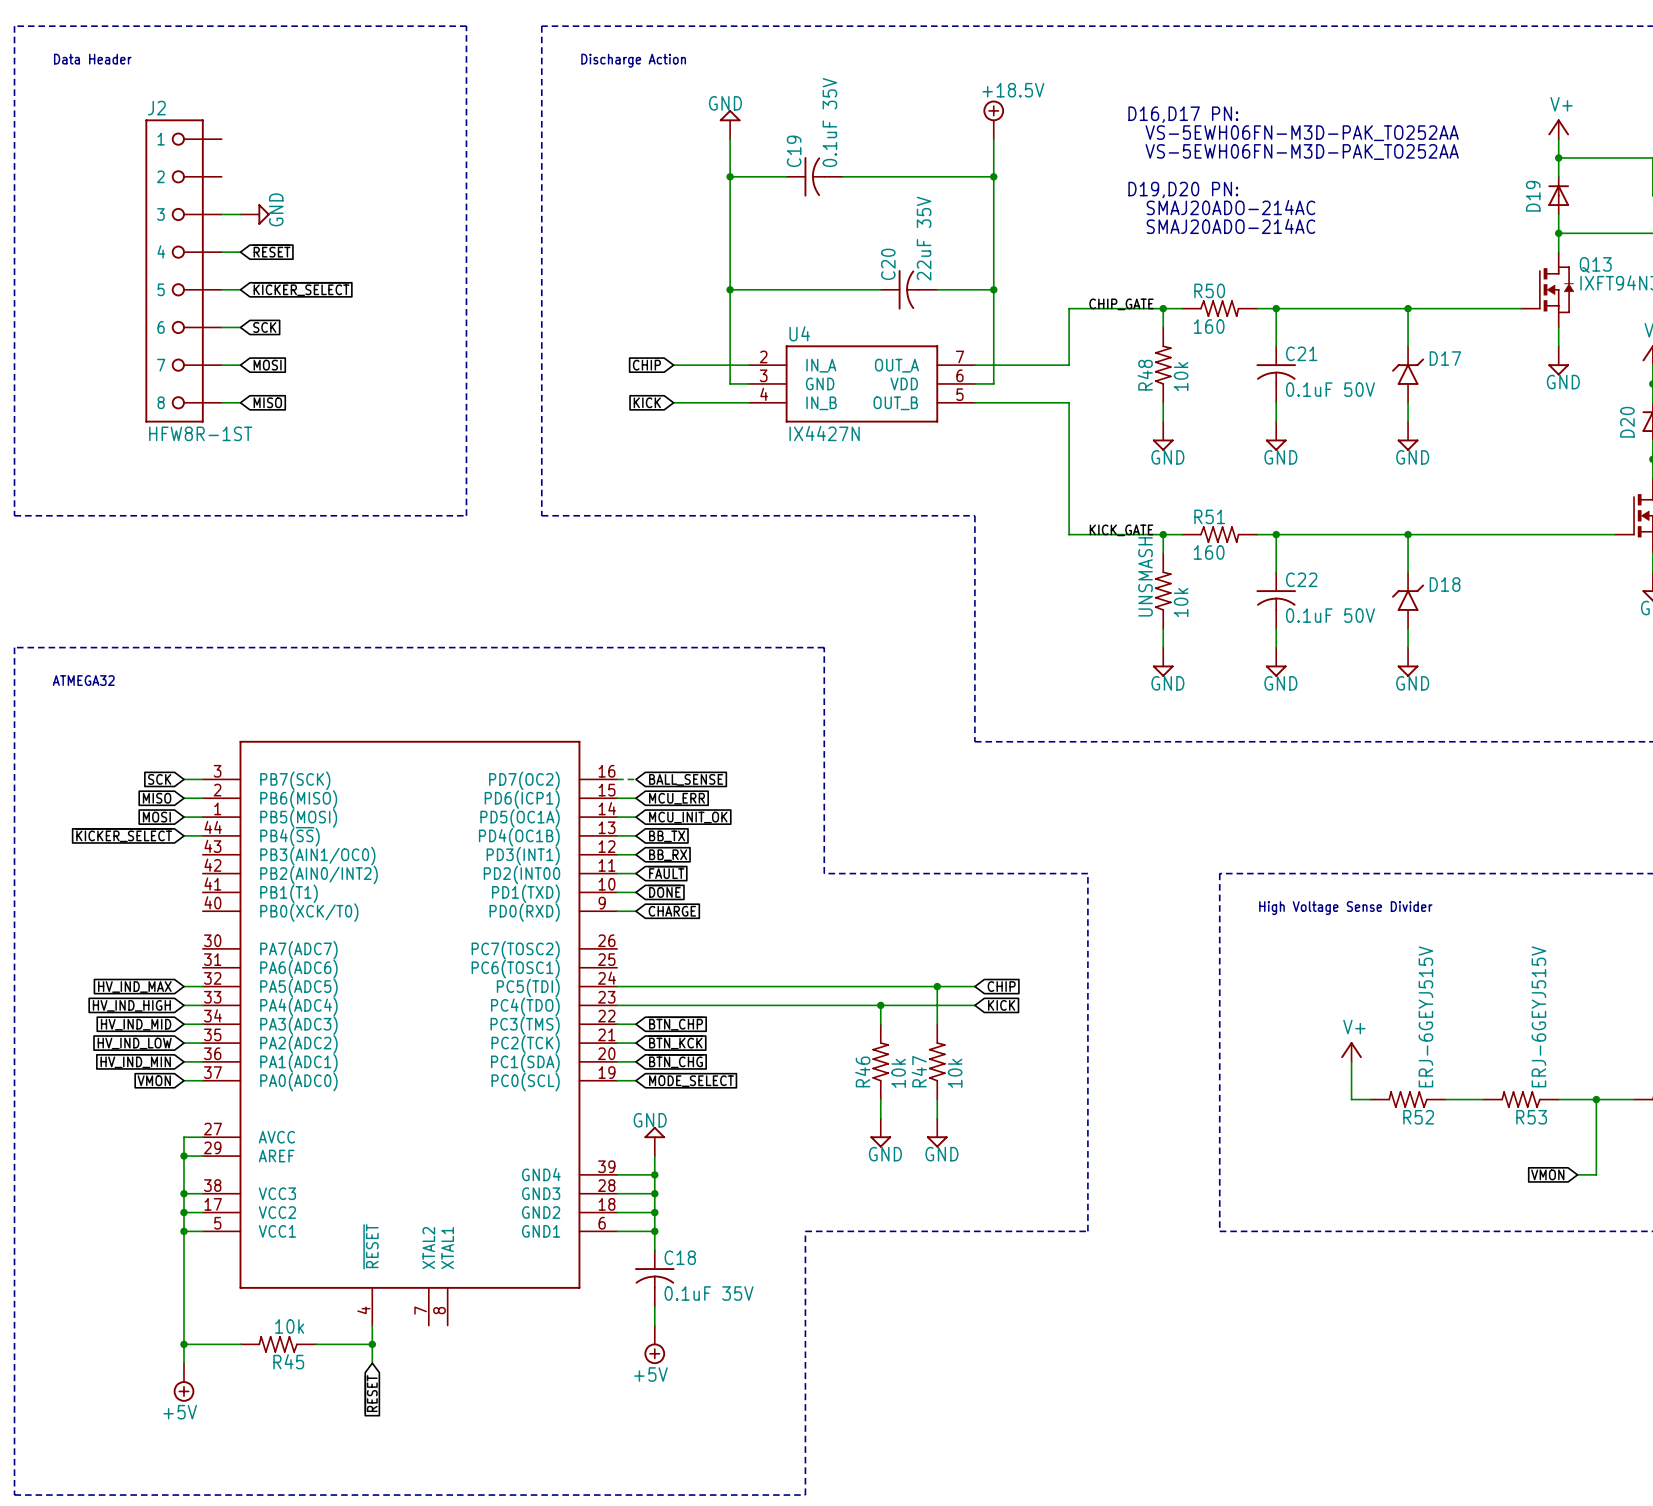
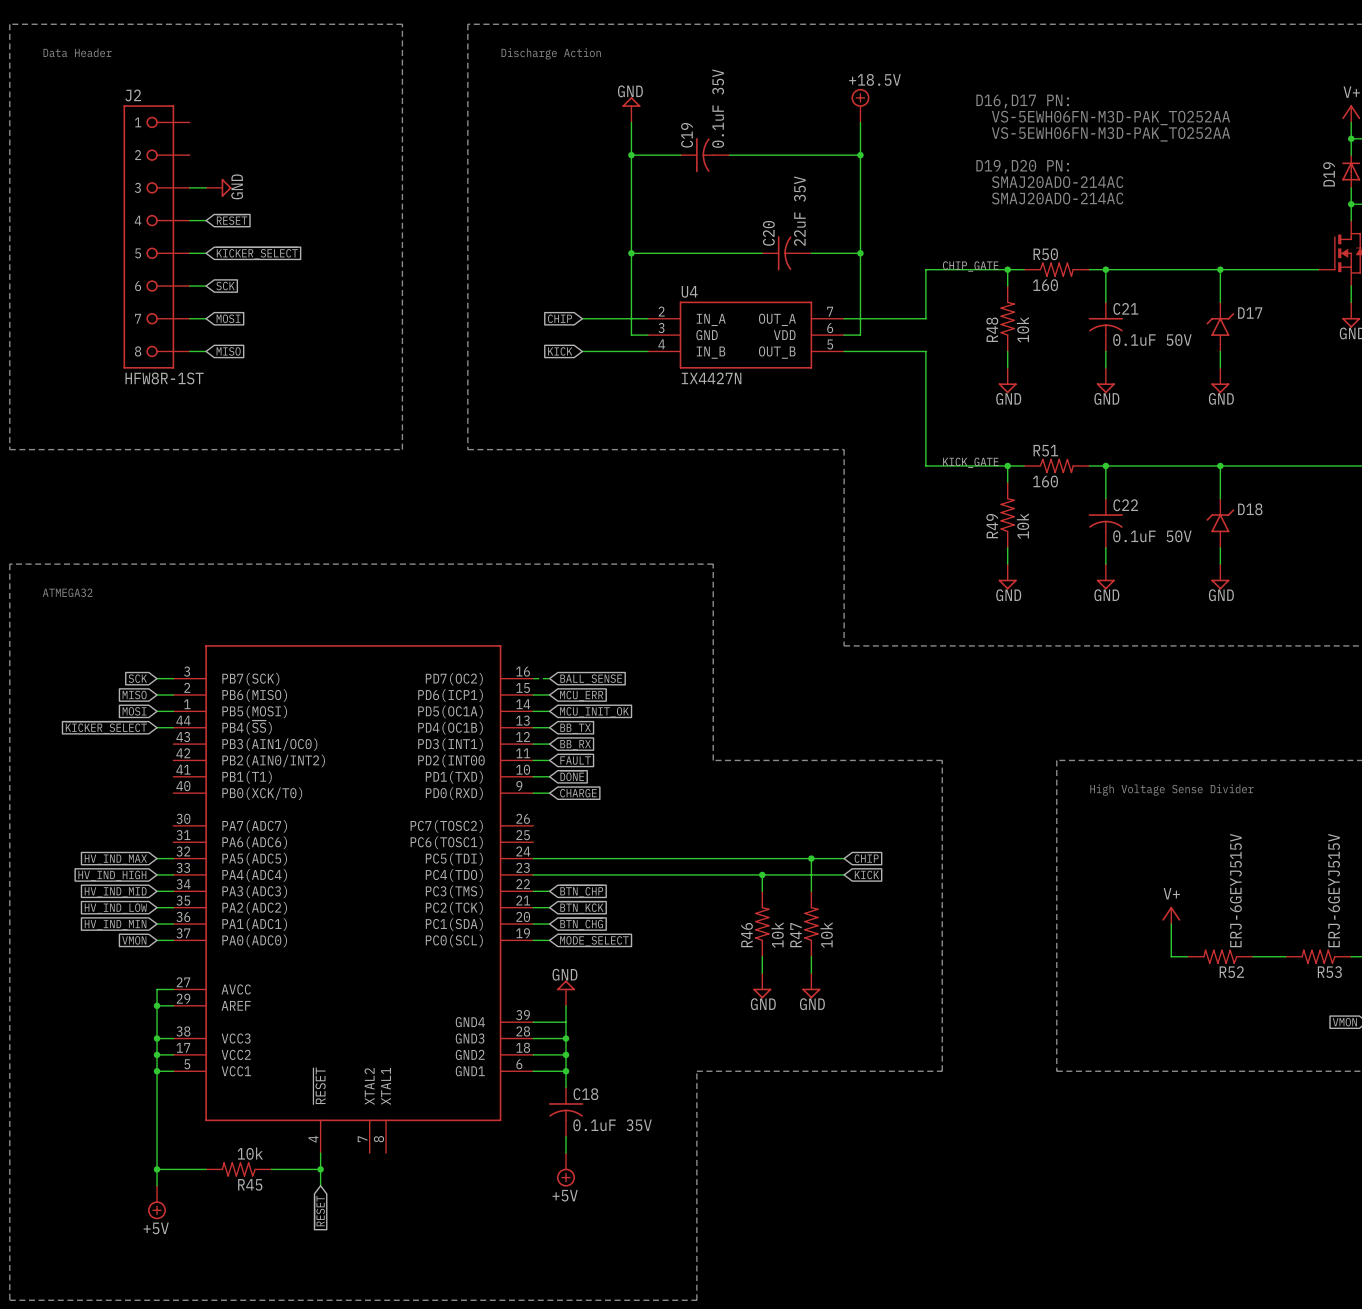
UNSMASH name: UNSMASH (1145, 576) -> R49 (992, 526)
junction: (654, 1174) -> none

